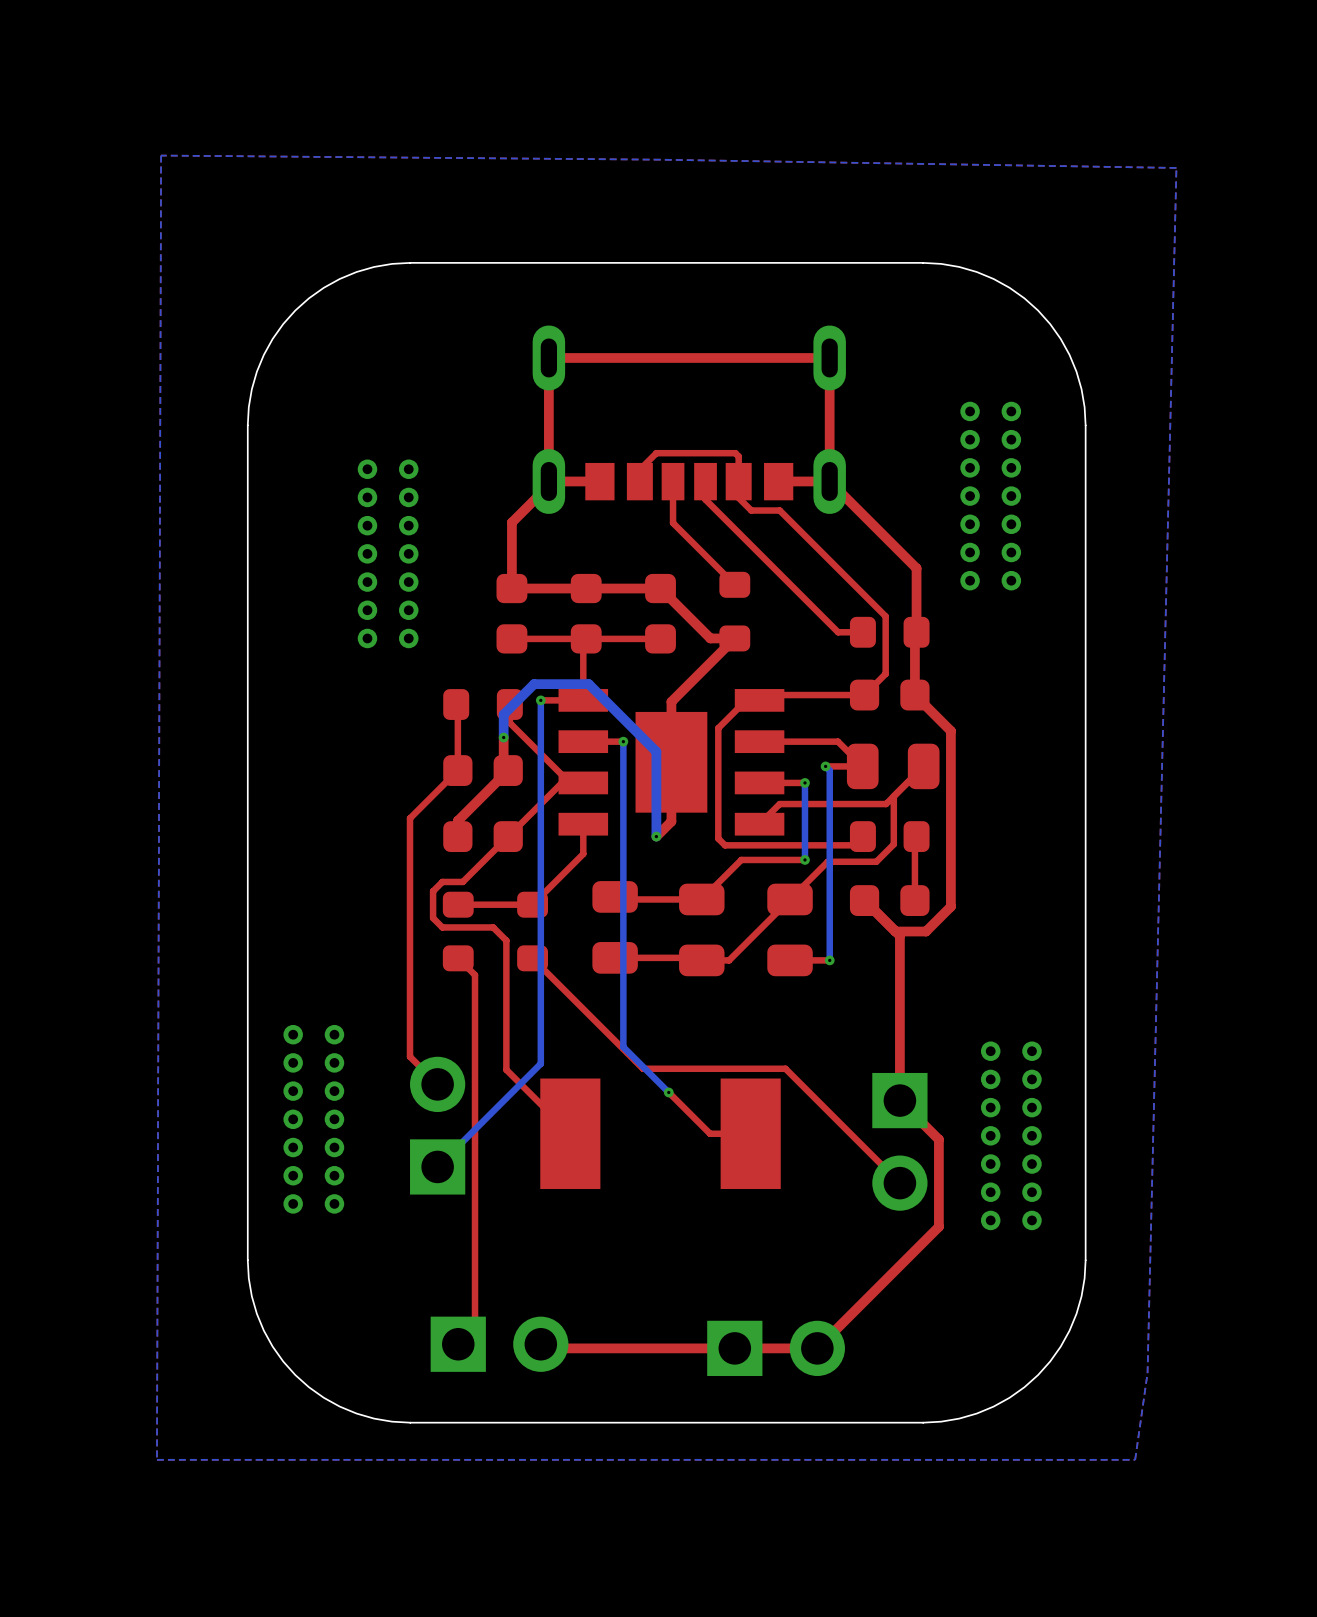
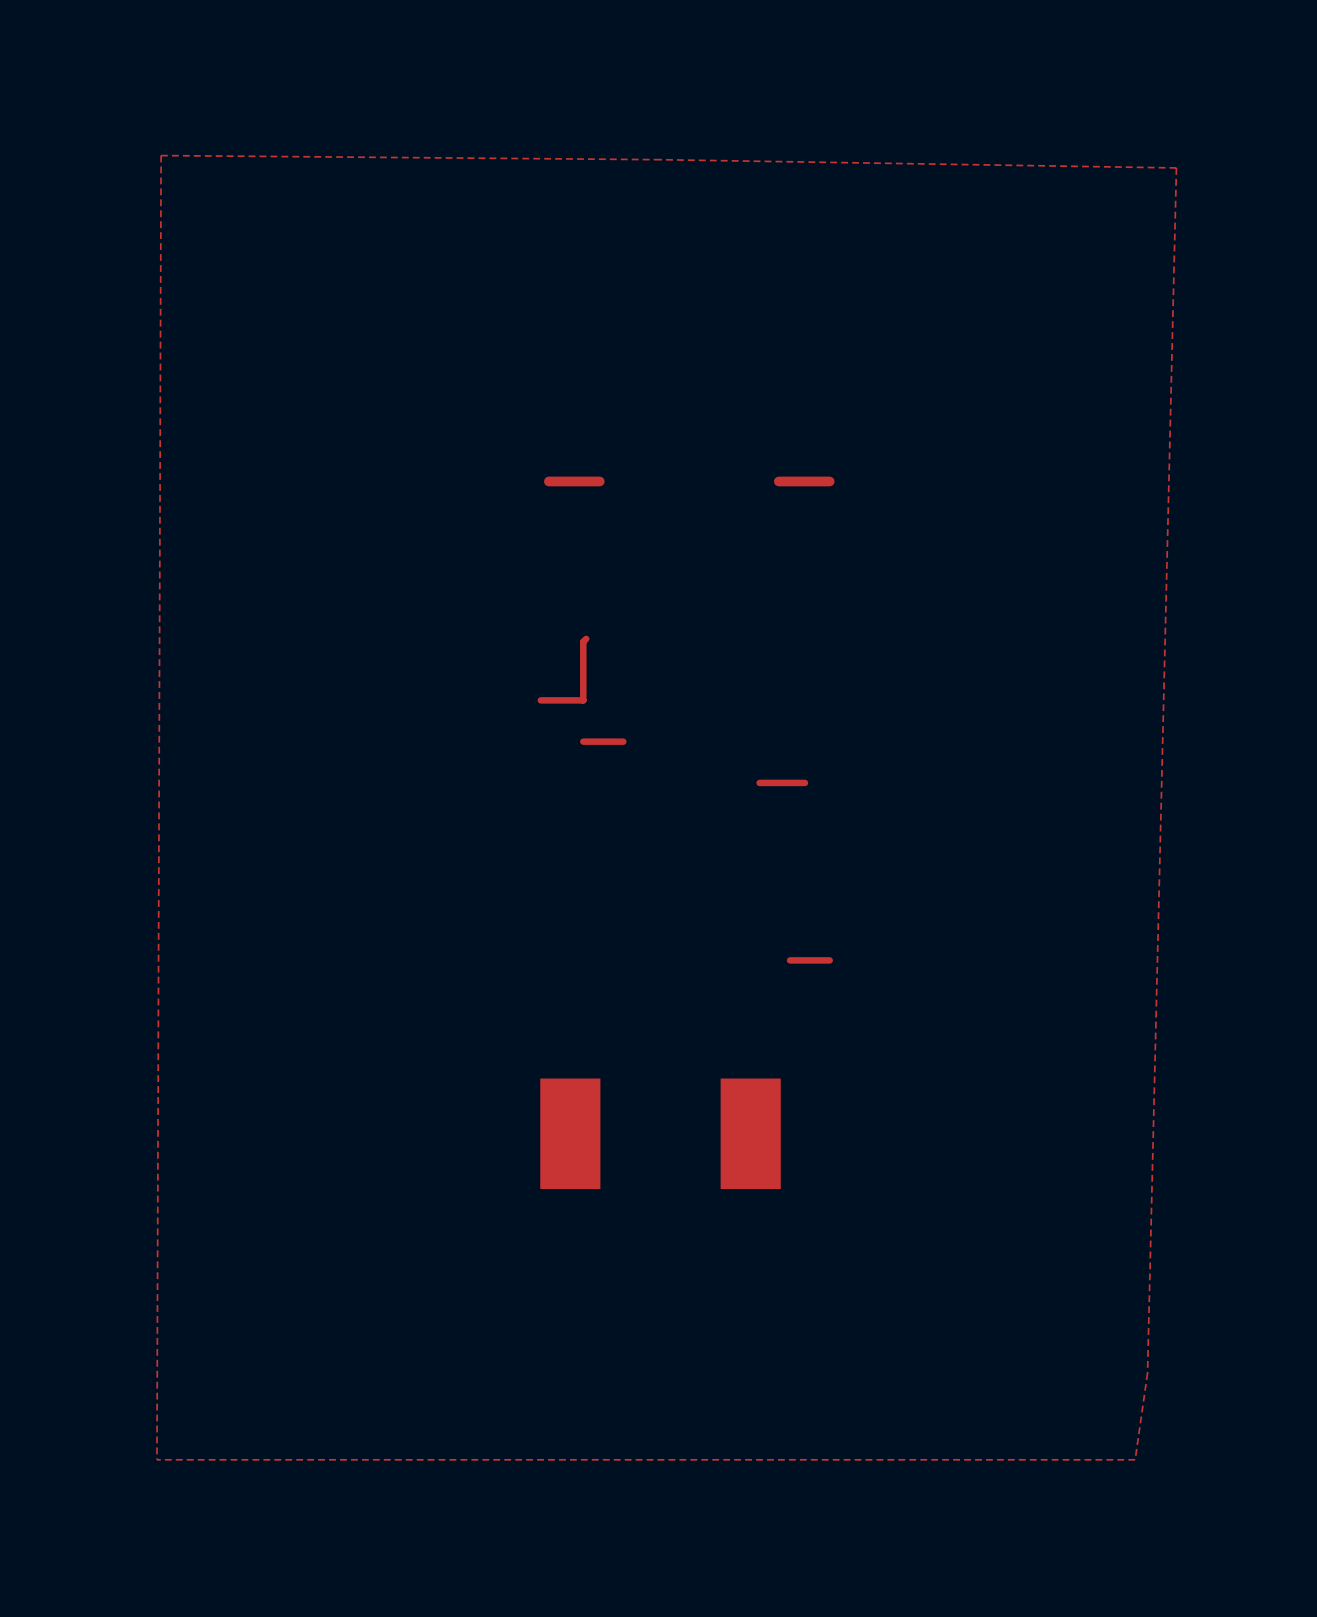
bottom zone outline: (161, 155) (660, 159) (1176, 167) (1147, 1373) (1135, 1459) (156, 1459) (161, 155) -> none
board edge: (923, 262) (392, 263) (356, 272) (323, 287) (308, 298) (283, 324) (263, 354) (251, 389) (247, 425) (248, 1278) (256, 1313) (272, 1346) (295, 1375) (308, 1387) (339, 1406) (374, 1418) (410, 1422) (941, 1421) (959, 1418) (993, 1406) (1024, 1387) (1050, 1361) (1069, 1330) (1081, 1296) (1085, 1260) (1084, 407) (1076, 371) (1069, 354) (1060, 338) (1038, 310) (1009, 287) (993, 278) (959, 266) (923, 262) -> none
via: (970, 411) -> none
via: (1011, 411) -> none
part: (689, 419) -> none
via: (970, 439) -> none
via: (1011, 439) -> none
via: (970, 467) -> none
via: (1011, 467) -> none
via: (367, 469) -> none
via: (408, 469) -> none
top track: (639, 481) (639, 469) (656, 453) (735, 453) (738, 456) (738, 497) (751, 510) (779, 510) (885, 616) (885, 673) (864, 695) (764, 695) (759, 700) (746, 700) (718, 728) (718, 838) (725, 845) (854, 845) (862, 836) -> none
top track: (673, 481) (673, 523) (734, 584) -> none
top track: (705, 481) (705, 499) (838, 632) (862, 632) -> none
via: (970, 496) -> none
via: (1011, 496) -> none
via: (367, 497) -> none
via: (408, 497) -> none
via: (970, 524) -> none
via: (1011, 524) -> none
via: (367, 525) -> none
via: (408, 525) -> none
via: (970, 552) -> none
via: (1011, 552) -> none
via: (367, 553) -> none
via: (408, 553) -> none
via: (970, 580) -> none
via: (1011, 580) -> none
via: (367, 582) -> none
via: (408, 582) -> none
via: (367, 610) -> none
via: (408, 610) -> none
part: (734, 611) -> none
part: (511, 613) -> none
part: (586, 613) -> none
part: (660, 613) -> none
part: (889, 632) -> none
via: (367, 638) -> none
via: (408, 638) -> none
top track: (660, 638) (511, 638) -> none
part: (889, 695) -> none
bottom track: (540, 700) (540, 1063) (437, 1166) -> none
via: (540, 700) -> none
top track: (456, 704) (457, 706) (457, 770) (410, 818) (410, 1056) (437, 1084) -> none
part: (483, 704) -> none
top track: (509, 704) (509, 722) (569, 782) -> none
top track: (503, 737) (503, 766) (508, 770) (457, 820) (457, 836) -> none
bottom track: (503, 737) (503, 714) (534, 684) (588, 684) (656, 751) (656, 836) -> none
via: (503, 737) -> none
bottom track: (623, 741) (623, 1047) (668, 1092) -> none
via: (623, 741) -> none
top track: (759, 741) (837, 741) (862, 766) (825, 766) -> none
part: (671, 762) -> none
bottom track: (825, 766) (829, 770) (829, 960) -> none
via: (825, 766) -> none
part: (893, 766) -> none
top track: (923, 766) (886, 804) (779, 804) (759, 824) -> none
part: (483, 770) -> none
top track: (583, 782) (561, 782) (462, 881) (442, 881) (433, 891) (433, 918) (442, 927) (493, 927) (506, 940) (506, 1069) (570, 1133) -> none
bottom track: (804, 782) (804, 859) -> none
via: (804, 782) -> none
top track: (893, 796) (893, 844) (876, 861) (827, 861) (729, 960) (701, 960) (699, 957) (615, 957) -> none
top track: (583, 824) (583, 853) (532, 904) (458, 904) -> none
part: (483, 836) -> none
top track: (656, 836) (671, 821) (671, 701) (734, 638) (710, 638) (660, 588) (511, 588) (511, 522) (548, 485) (548, 357) (829, 357) (829, 481) (916, 568) (914, 695) (950, 731) (950, 906) (926, 931) (895, 931) -> none
via: (656, 836) -> none
part: (889, 836) -> none
top track: (916, 836) (914, 838) (914, 900) -> none
top track: (804, 859) (741, 859) (701, 899) (617, 899) (615, 896) -> none
via: (804, 859) -> none
top track: (864, 900) (899, 935) (899, 1100) (938, 1139) (938, 1226) (817, 1348) (544, 1348) (540, 1344) -> none
part: (889, 900) -> none
part: (615, 927) -> none
part: (701, 929) -> none
part: (790, 929) -> none
part: (458, 931) -> none
part: (532, 931) -> none
top track: (458, 958) (475, 975) (475, 1327) (458, 1344) -> none
top track: (532, 958) (643, 1068) (785, 1068) (899, 1183) -> none
via: (829, 960) -> none
via: (293, 1034) -> none
via: (334, 1034) -> none
via: (990, 1051) -> none
via: (1031, 1051) -> none
via: (293, 1062) -> none
via: (334, 1062) -> none
via: (990, 1079) -> none
via: (1031, 1079) -> none
via: (293, 1091) -> none
via: (334, 1091) -> none
top track: (668, 1092) (710, 1133) (750, 1133) -> none
via: (668, 1092) -> none
via: (990, 1107) -> none
via: (1031, 1107) -> none
via: (293, 1119) -> none
via: (334, 1119) -> none
part: (437, 1125) -> none
via: (990, 1135) -> none
via: (1031, 1135) -> none
part: (899, 1141) -> none
via: (293, 1147) -> none
via: (334, 1147) -> none
via: (990, 1164) -> none
via: (1031, 1164) -> none
via: (293, 1175) -> none
via: (334, 1175) -> none
via: (990, 1192) -> none
via: (1031, 1192) -> none
via: (293, 1203) -> none
via: (334, 1203) -> none
via: (990, 1220) -> none
via: (1031, 1220) -> none
part: (499, 1344) -> none
part: (776, 1348) -> none

